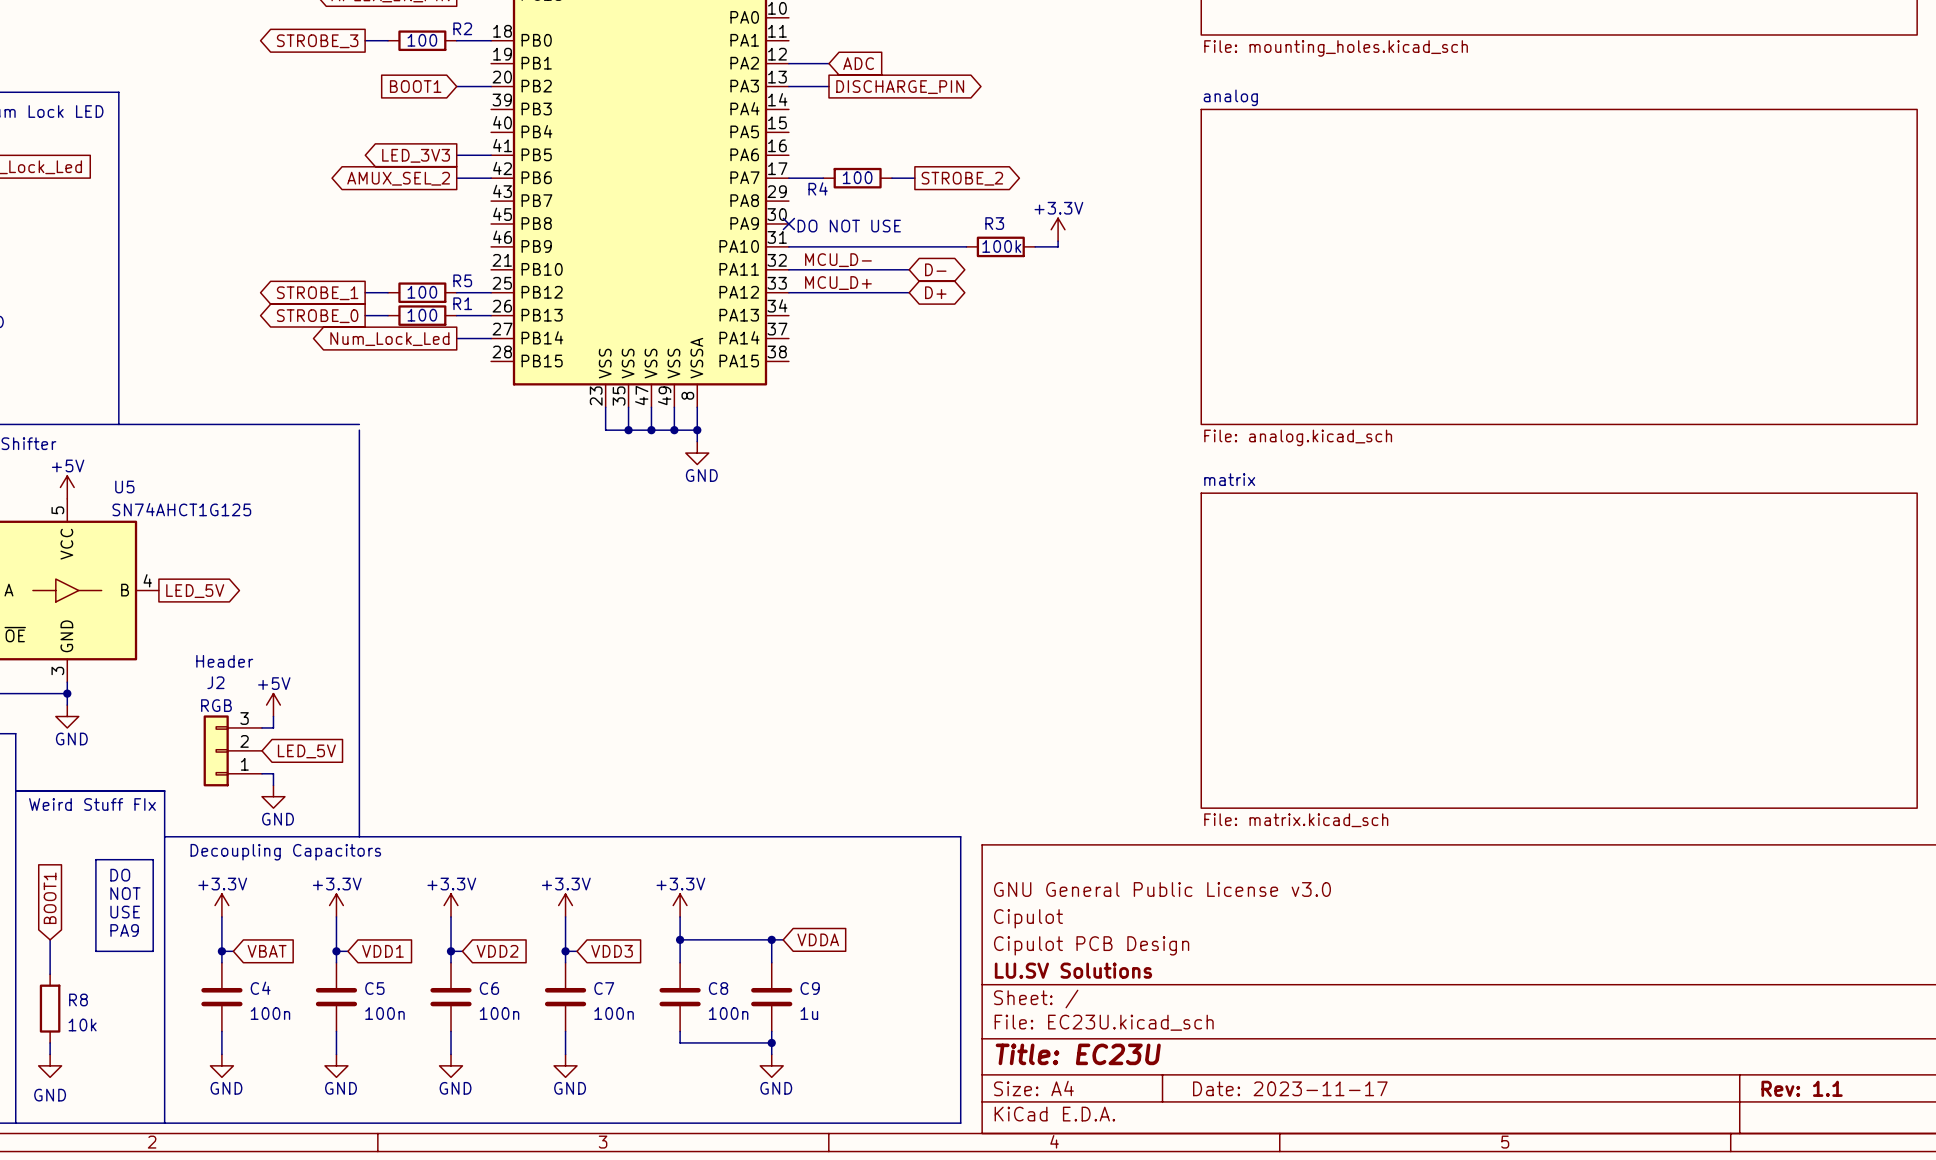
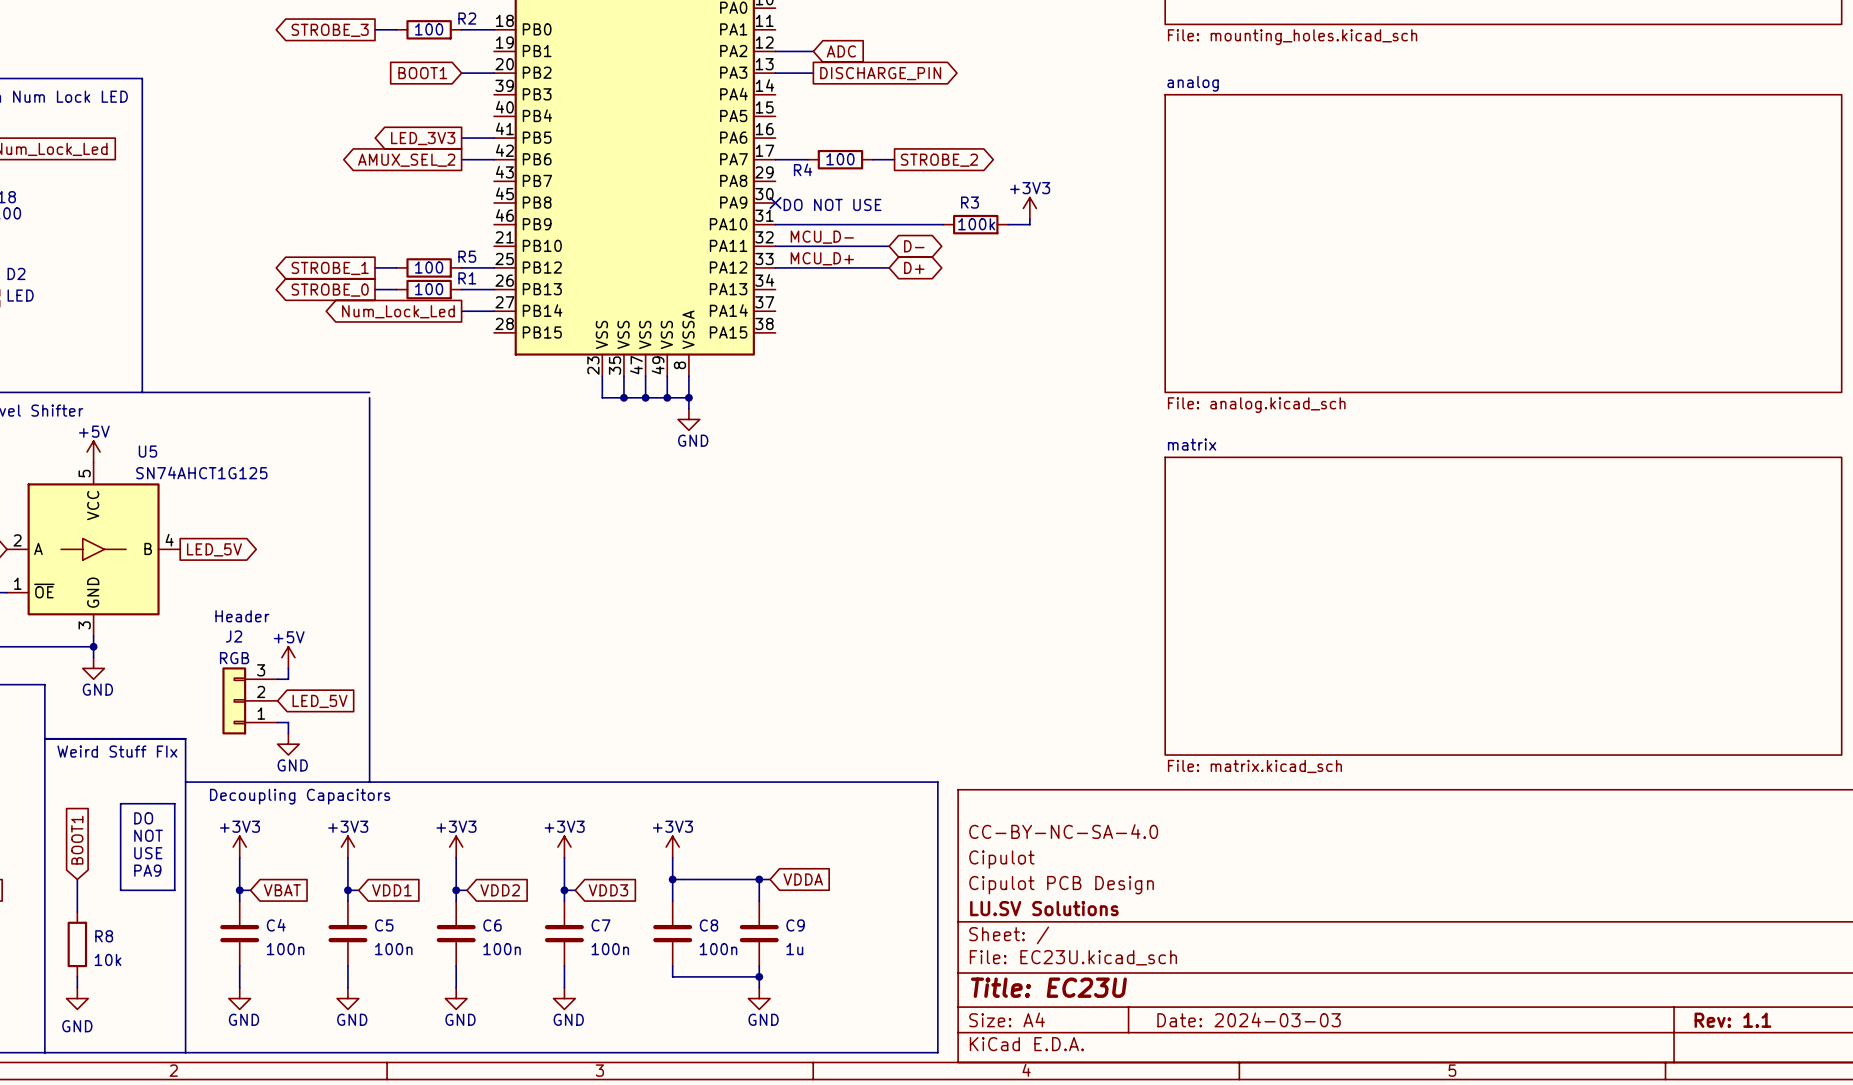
power symbol: +3.3V (1058, 229) -> +3V3 (1029, 208)
title block: GNU General Public License v3.0 (1162, 889) -> CC-BY-NC-SA-4.0 (1063, 831)
power symbol: +3.3V (221, 905) -> +3V3 (239, 847)
power symbol: +3.3V (336, 905) -> +3V3 (347, 847)
power symbol: +3.3V (451, 905) -> +3V3 (456, 847)
power symbol: +3.3V (565, 905) -> +3V3 (564, 847)
power symbol: +3.3V (680, 905) -> +3V3 (672, 847)
title block: Date: 2023-11-17 (1290, 1088) -> Date: 2024-03-03 (1249, 1019)

